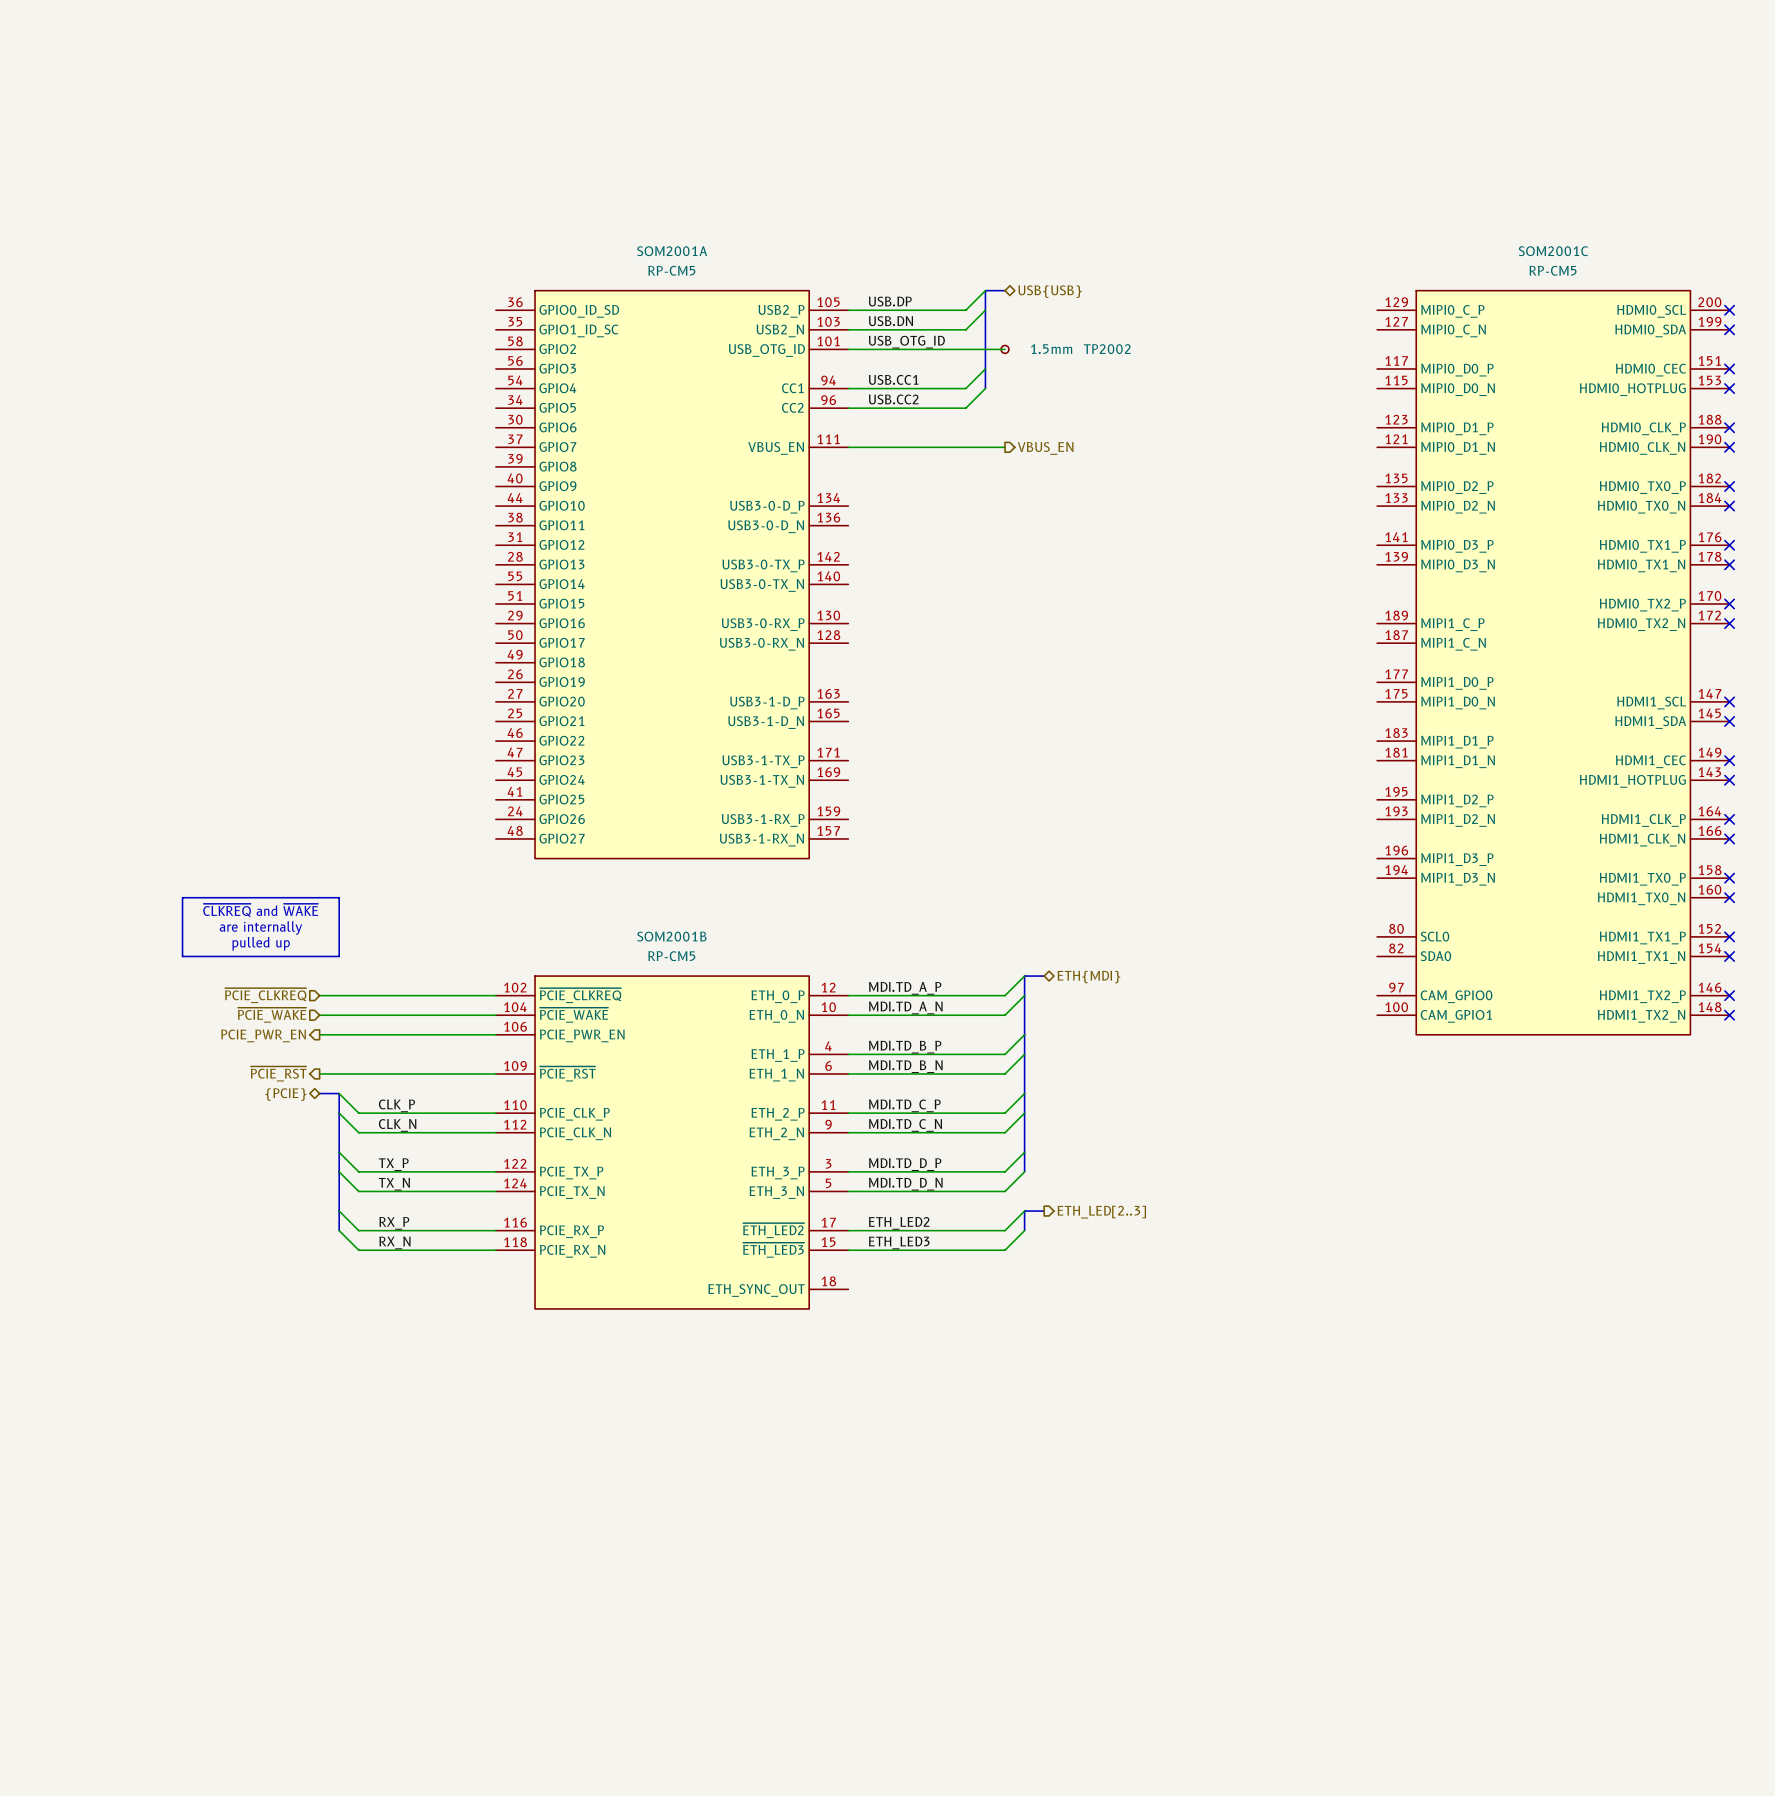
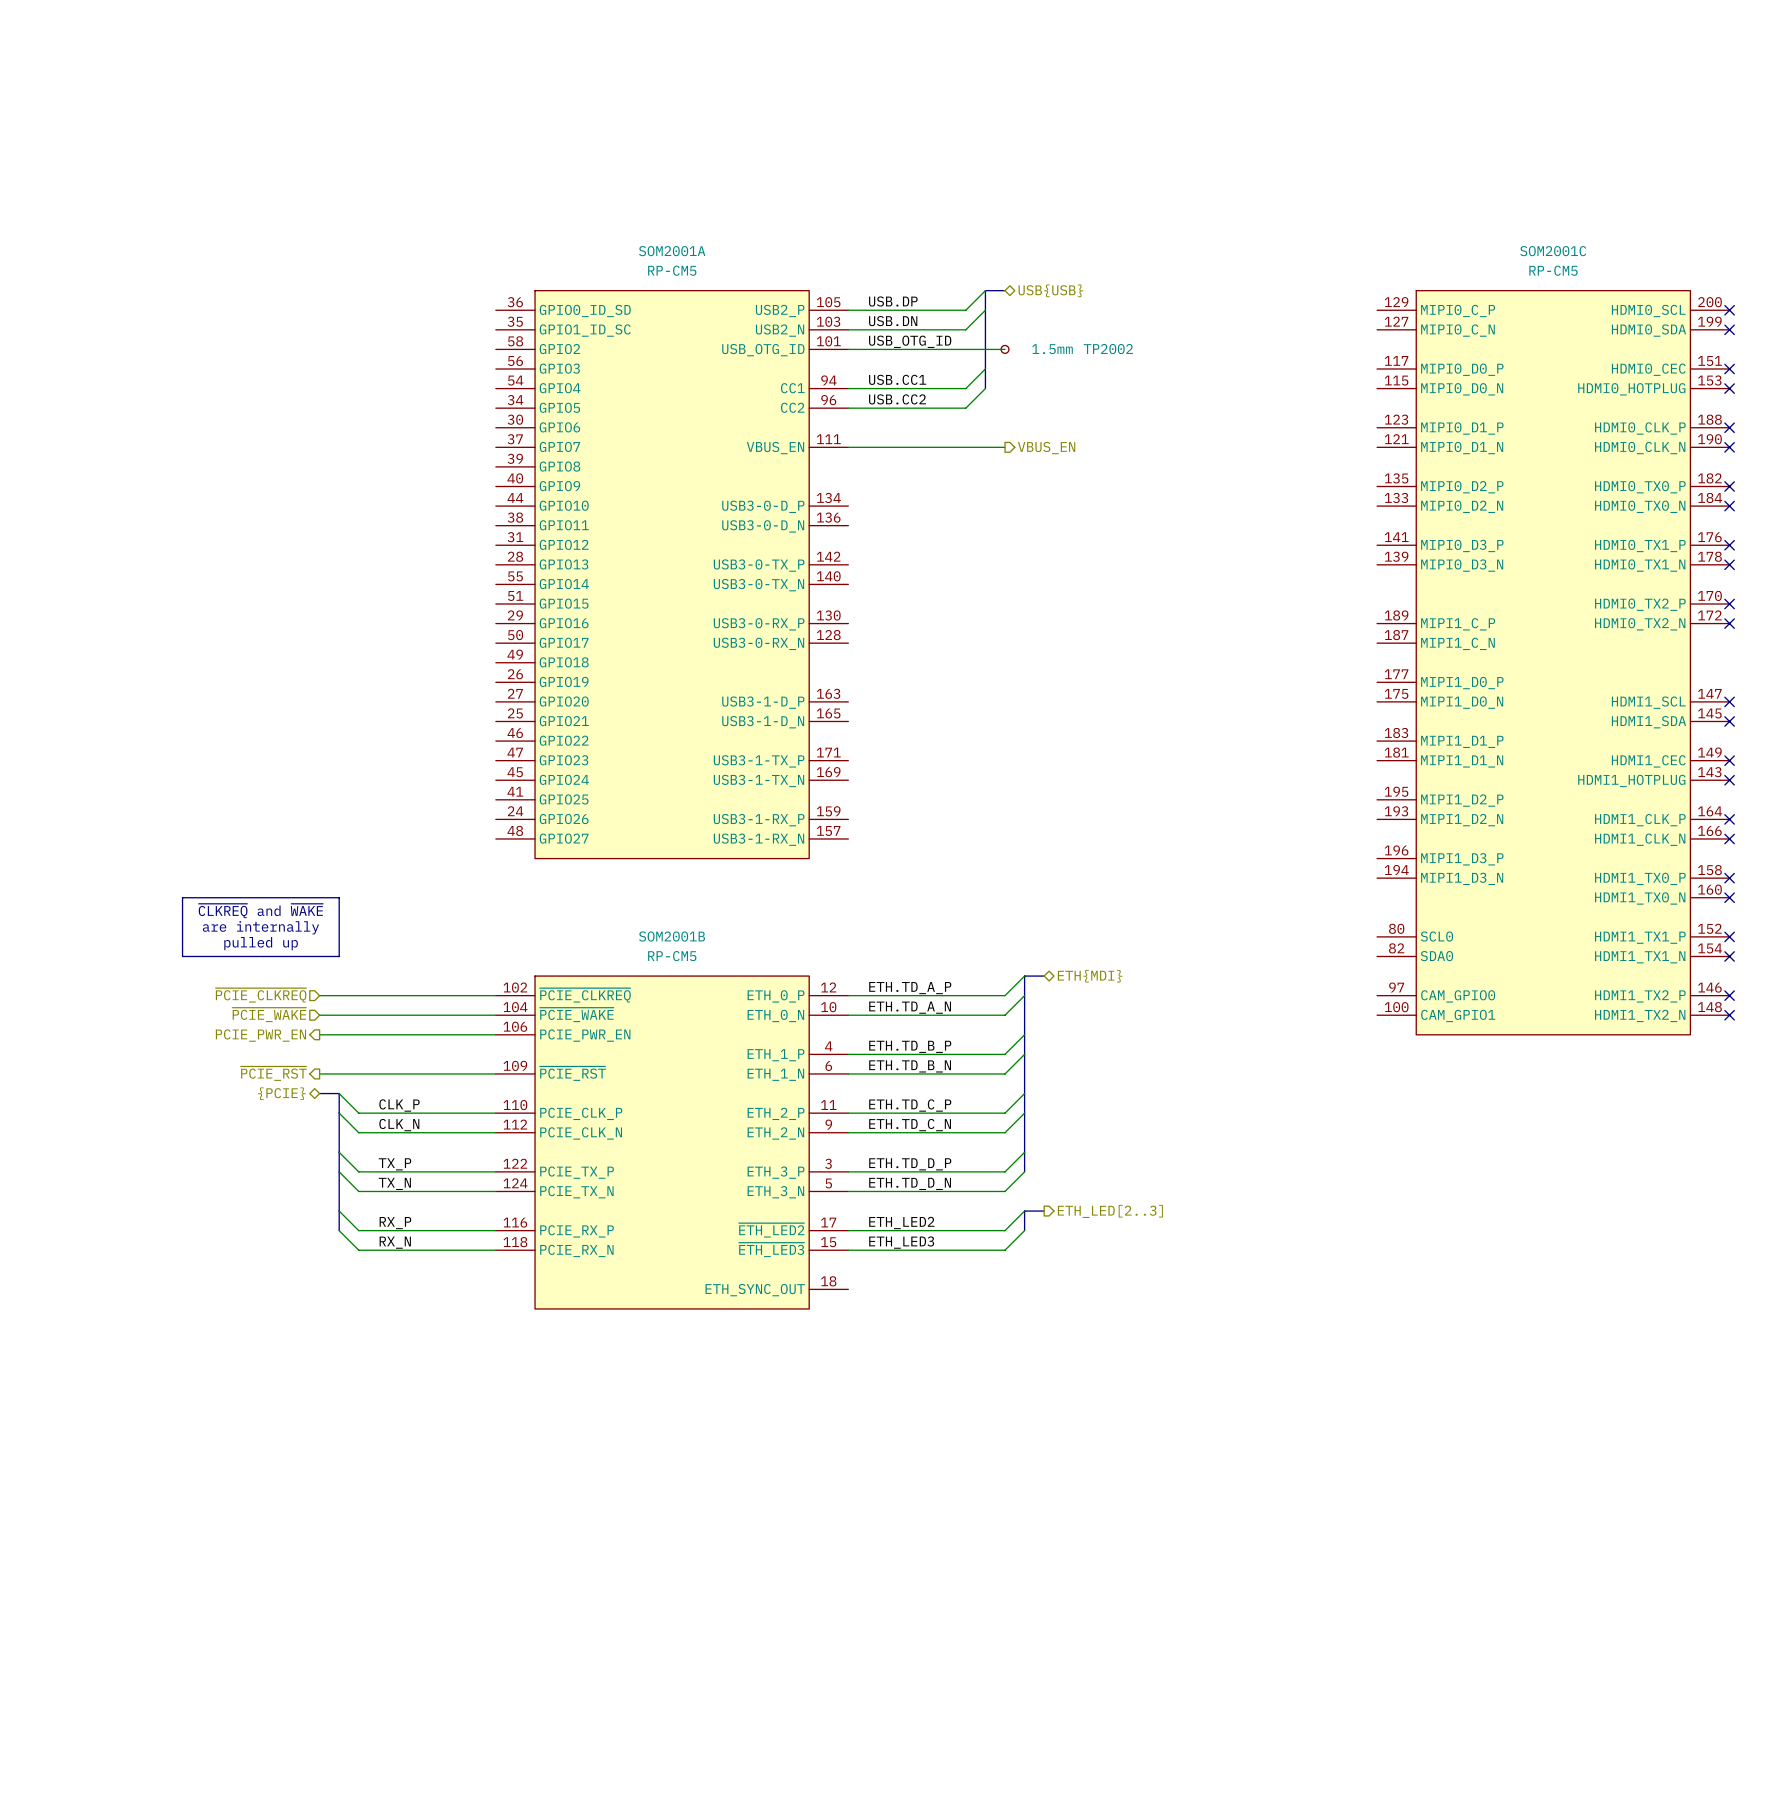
label: MDI.TD_A_P (905, 988) -> ETH.TD_A_P (910, 988)
label: MDI.TD_A_N (905, 1007) -> ETH.TD_A_N (910, 1007)
label: MDI.TD_B_P (905, 1047) -> ETH.TD_B_P (910, 1046)
label: MDI.TD_B_N (905, 1066) -> ETH.TD_B_N (910, 1066)
label: MDI.TD_C_P (904, 1105) -> ETH.TD_C_P (910, 1105)
label: MDI.TD_C_N (905, 1125) -> ETH.TD_C_N (910, 1125)
label: MDI.TD_D_P (905, 1164) -> ETH.TD_D_P (910, 1164)
label: MDI.TD_D_N (905, 1184) -> ETH.TD_D_N (910, 1183)

